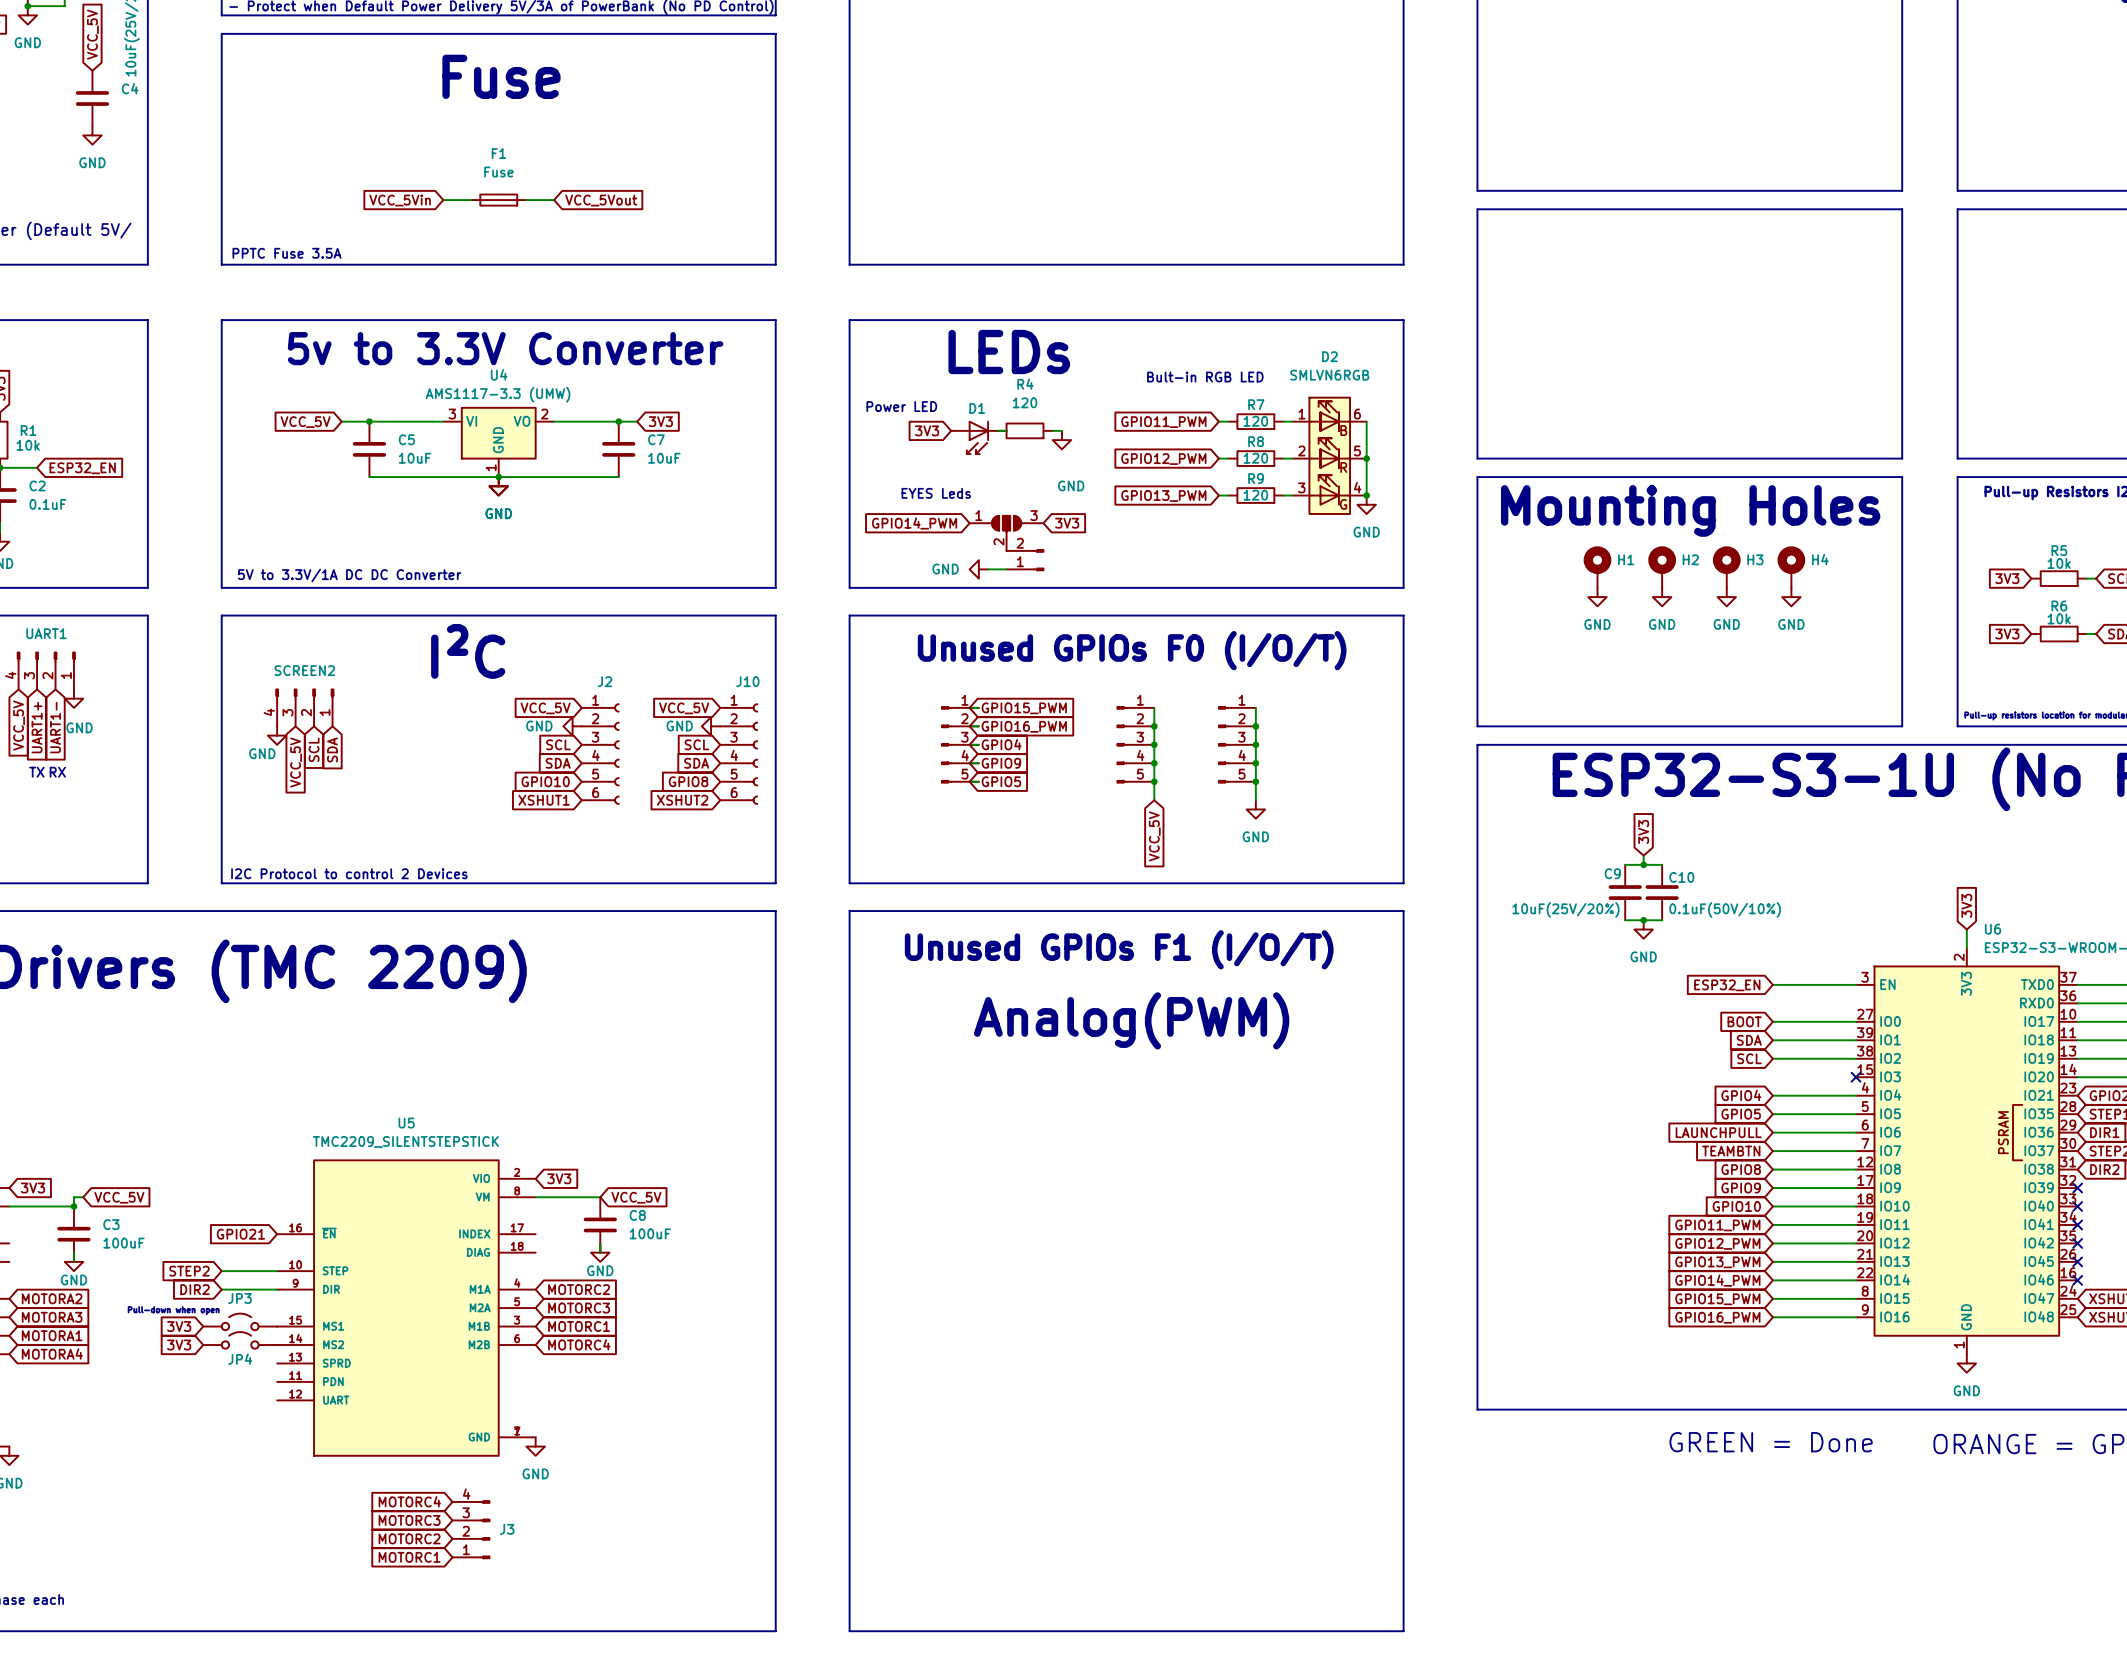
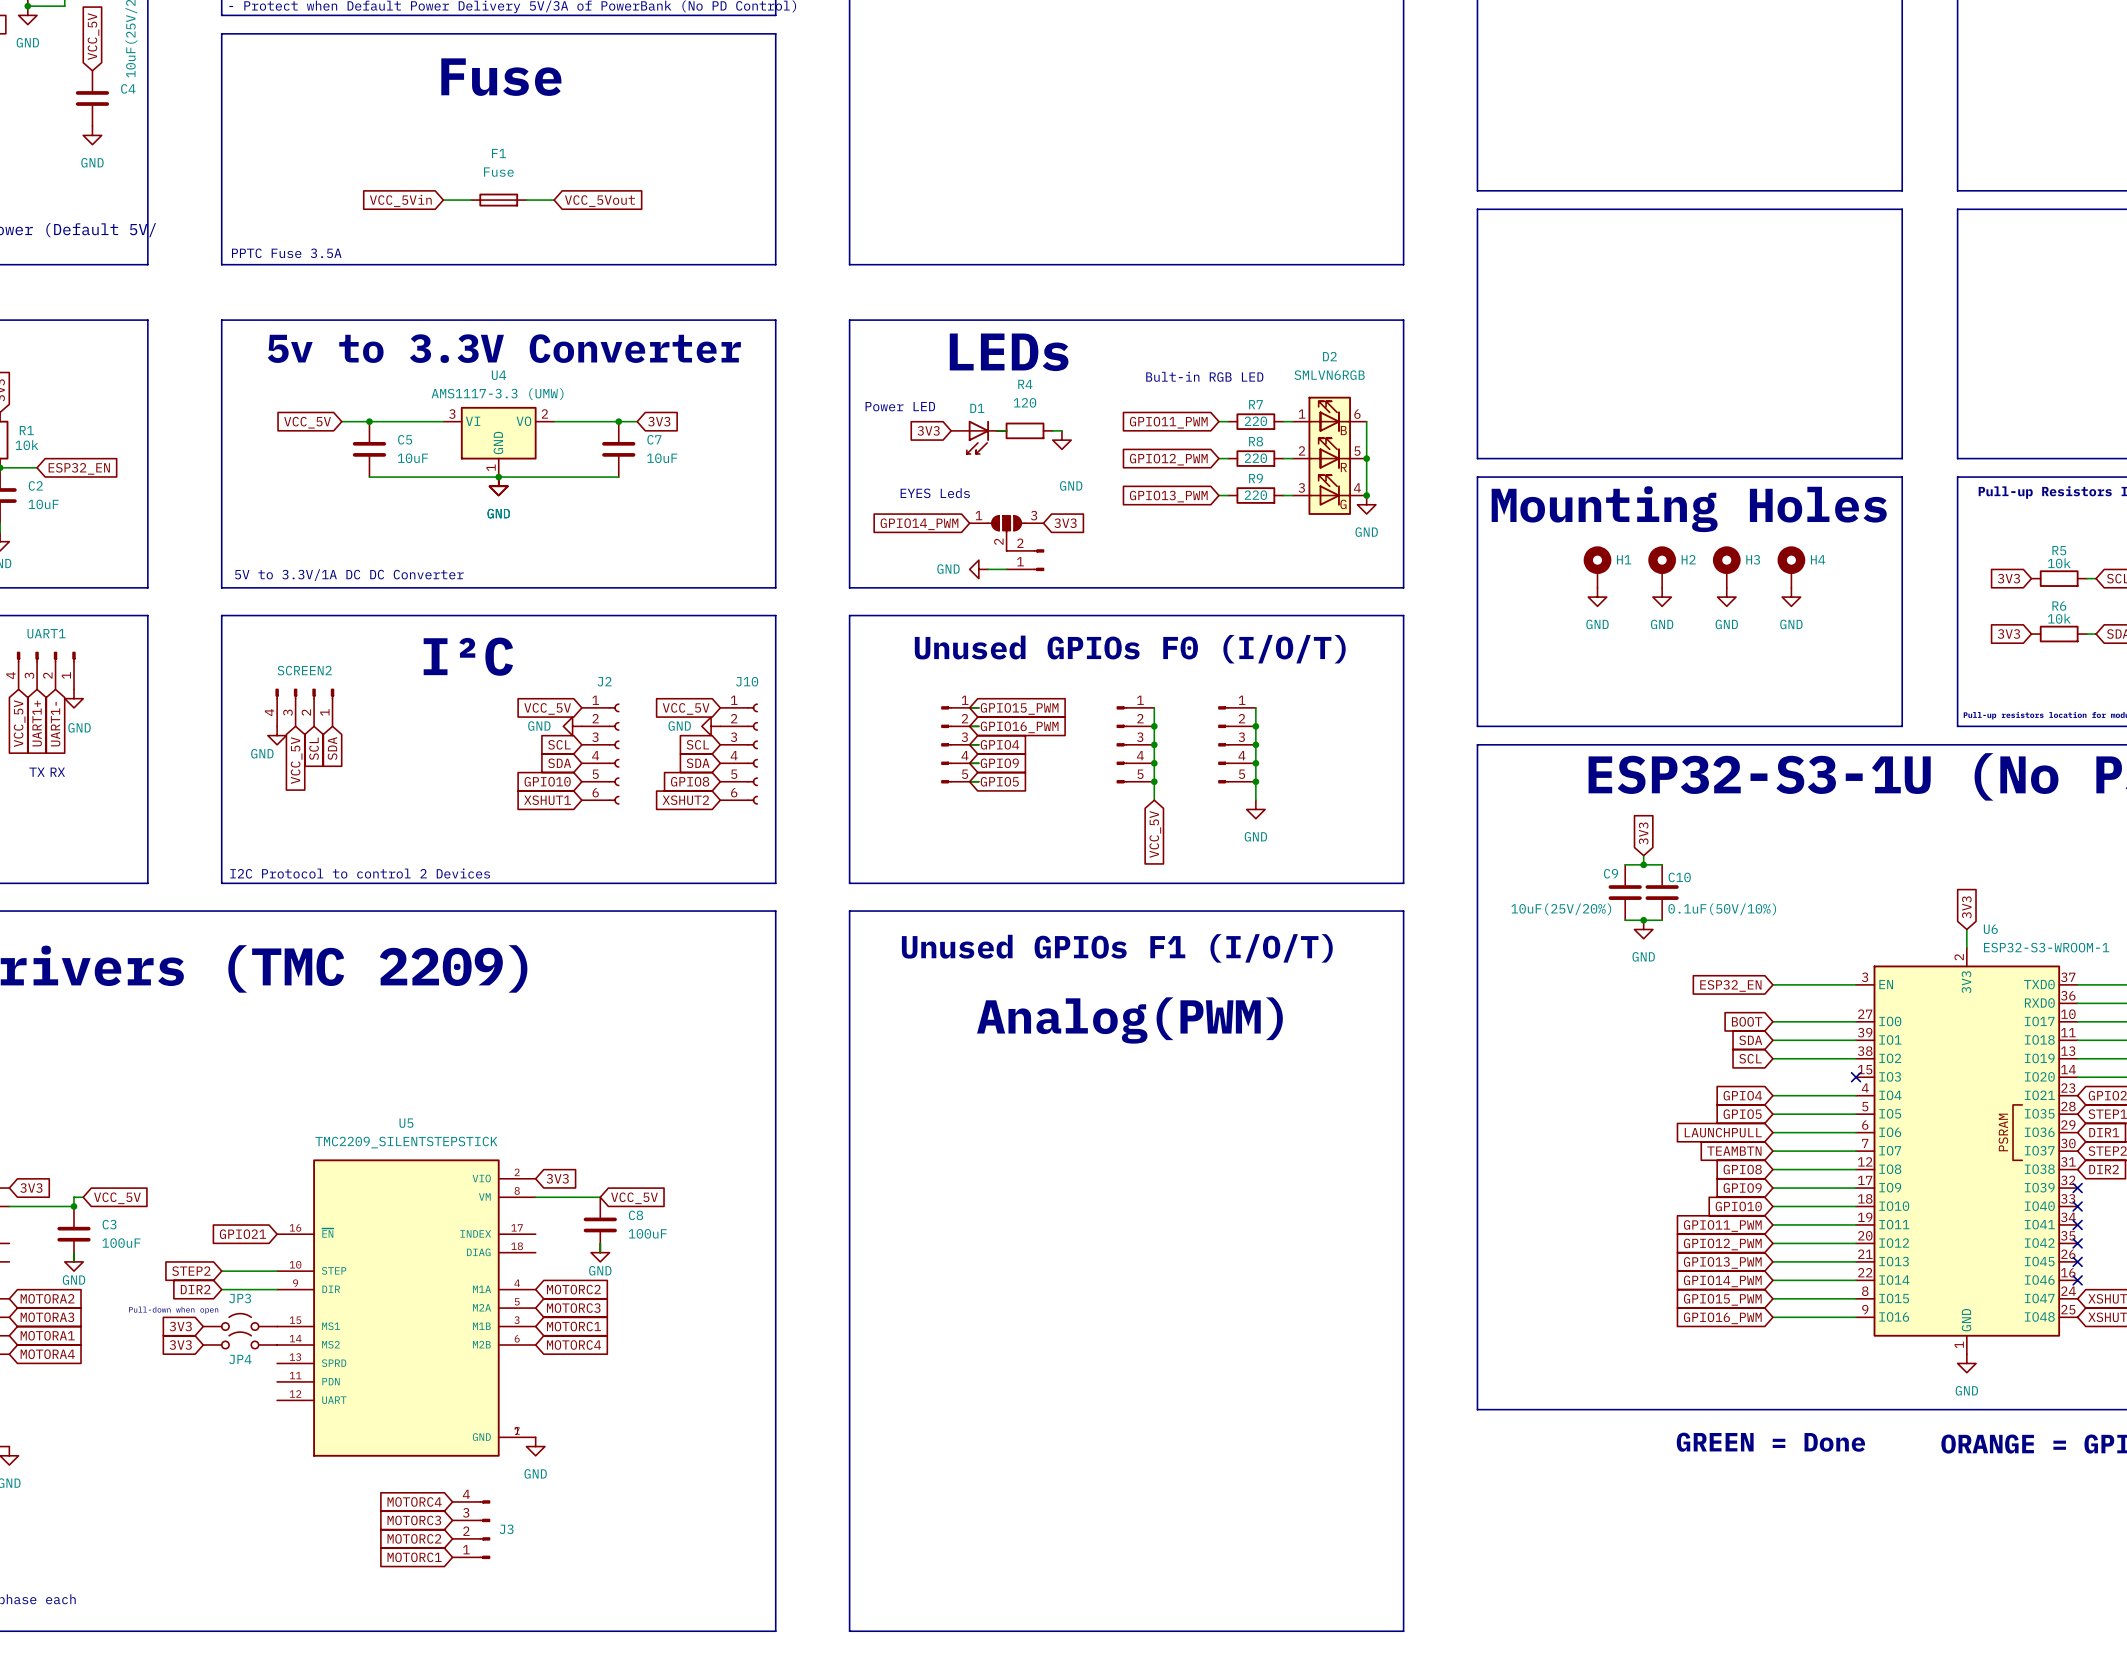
R7 value: 120 (1255, 421) -> 220 (1255, 421)
R8 value: 120 (1255, 458) -> 220 (1255, 458)
R9 value: 120 (1255, 495) -> 220 (1255, 495)
C2 value: 0.1uF (47, 504) -> 10uF (43, 504)

